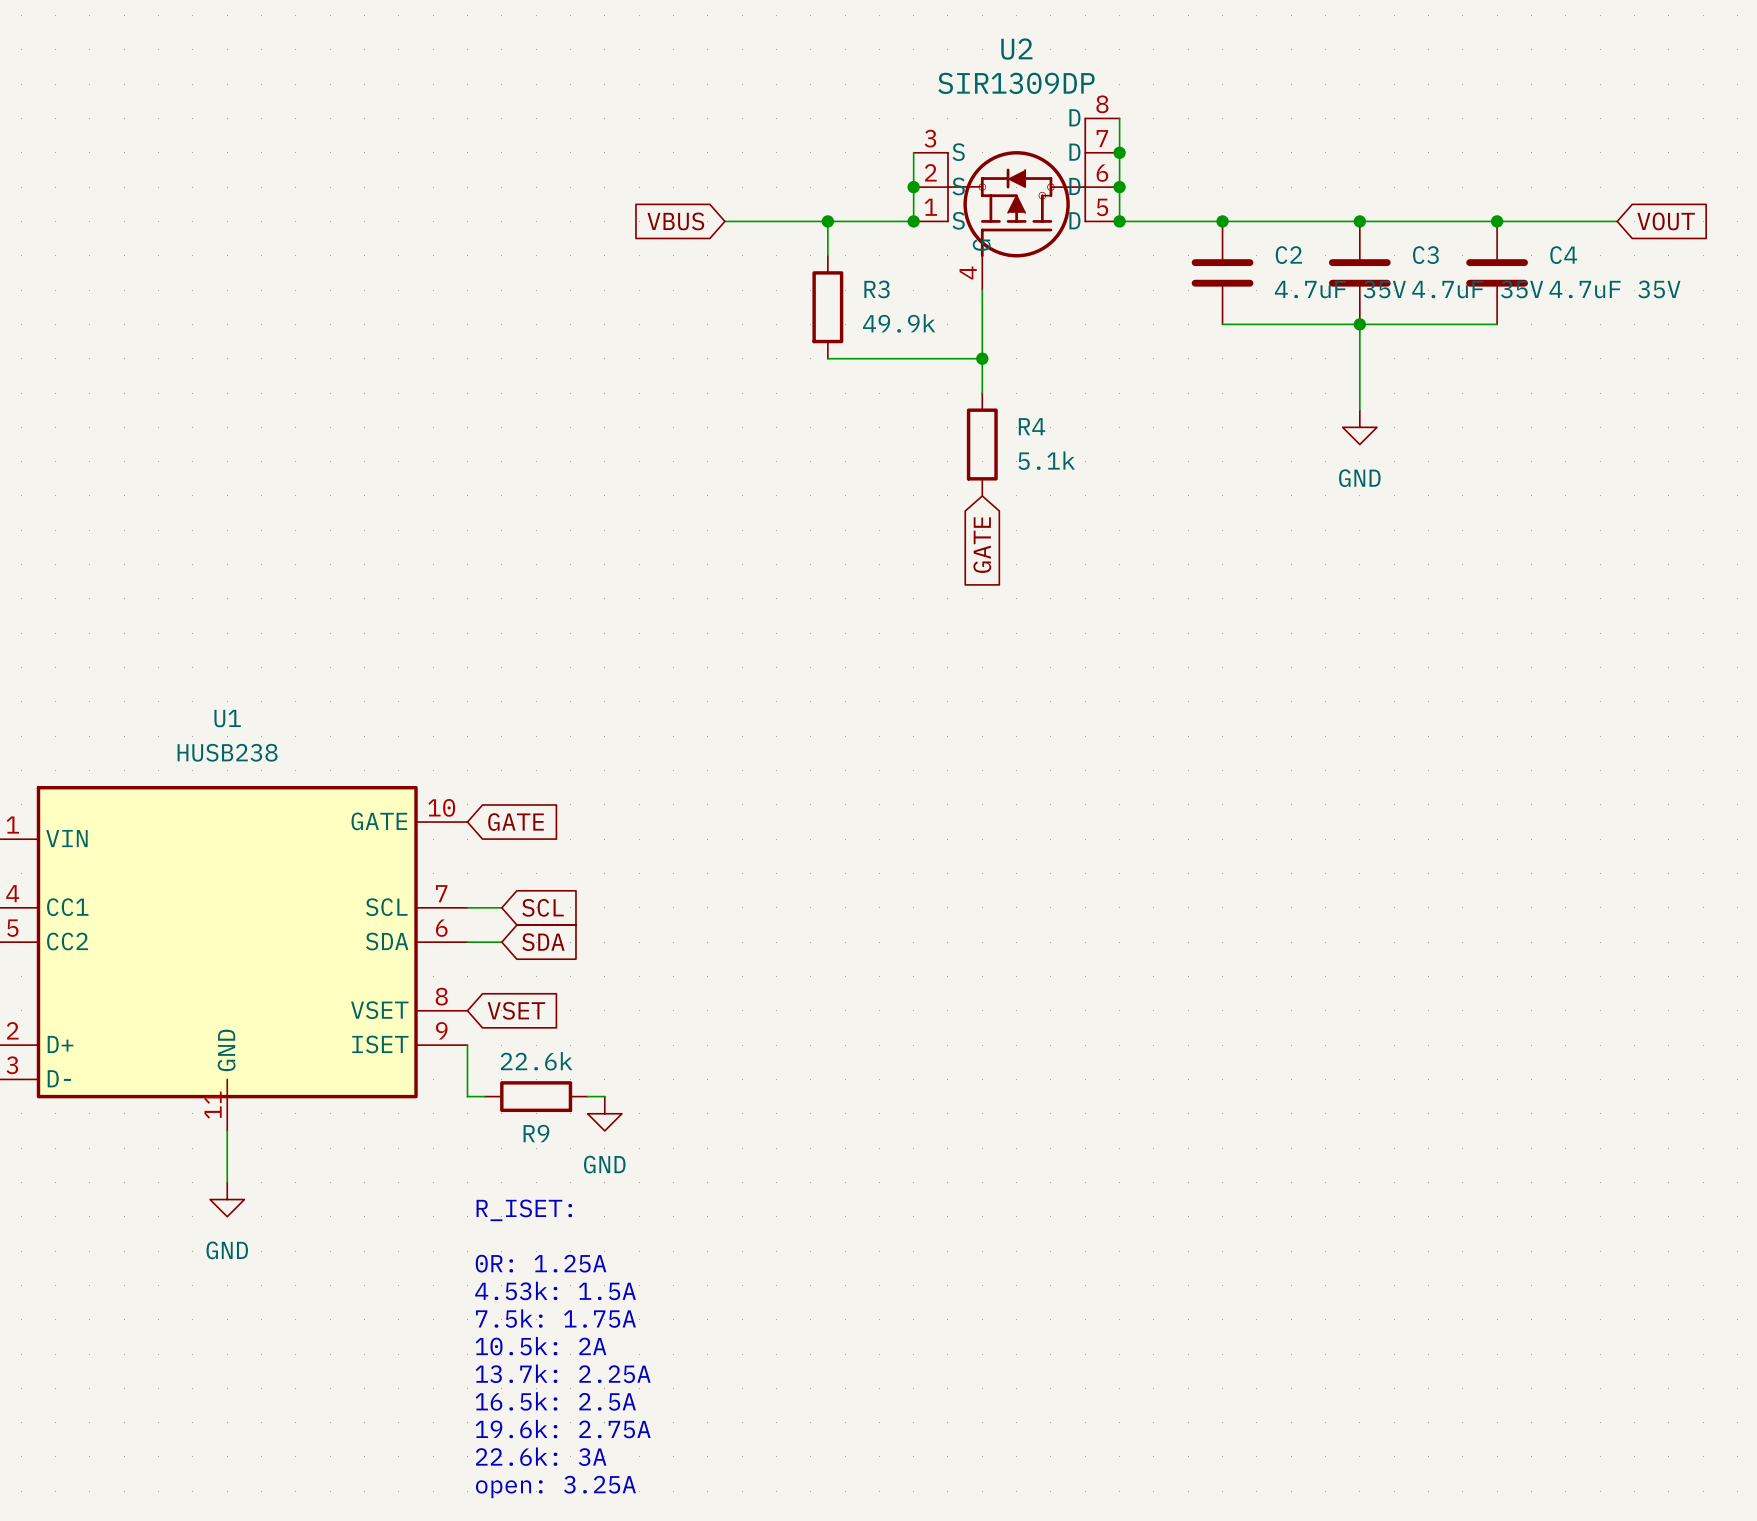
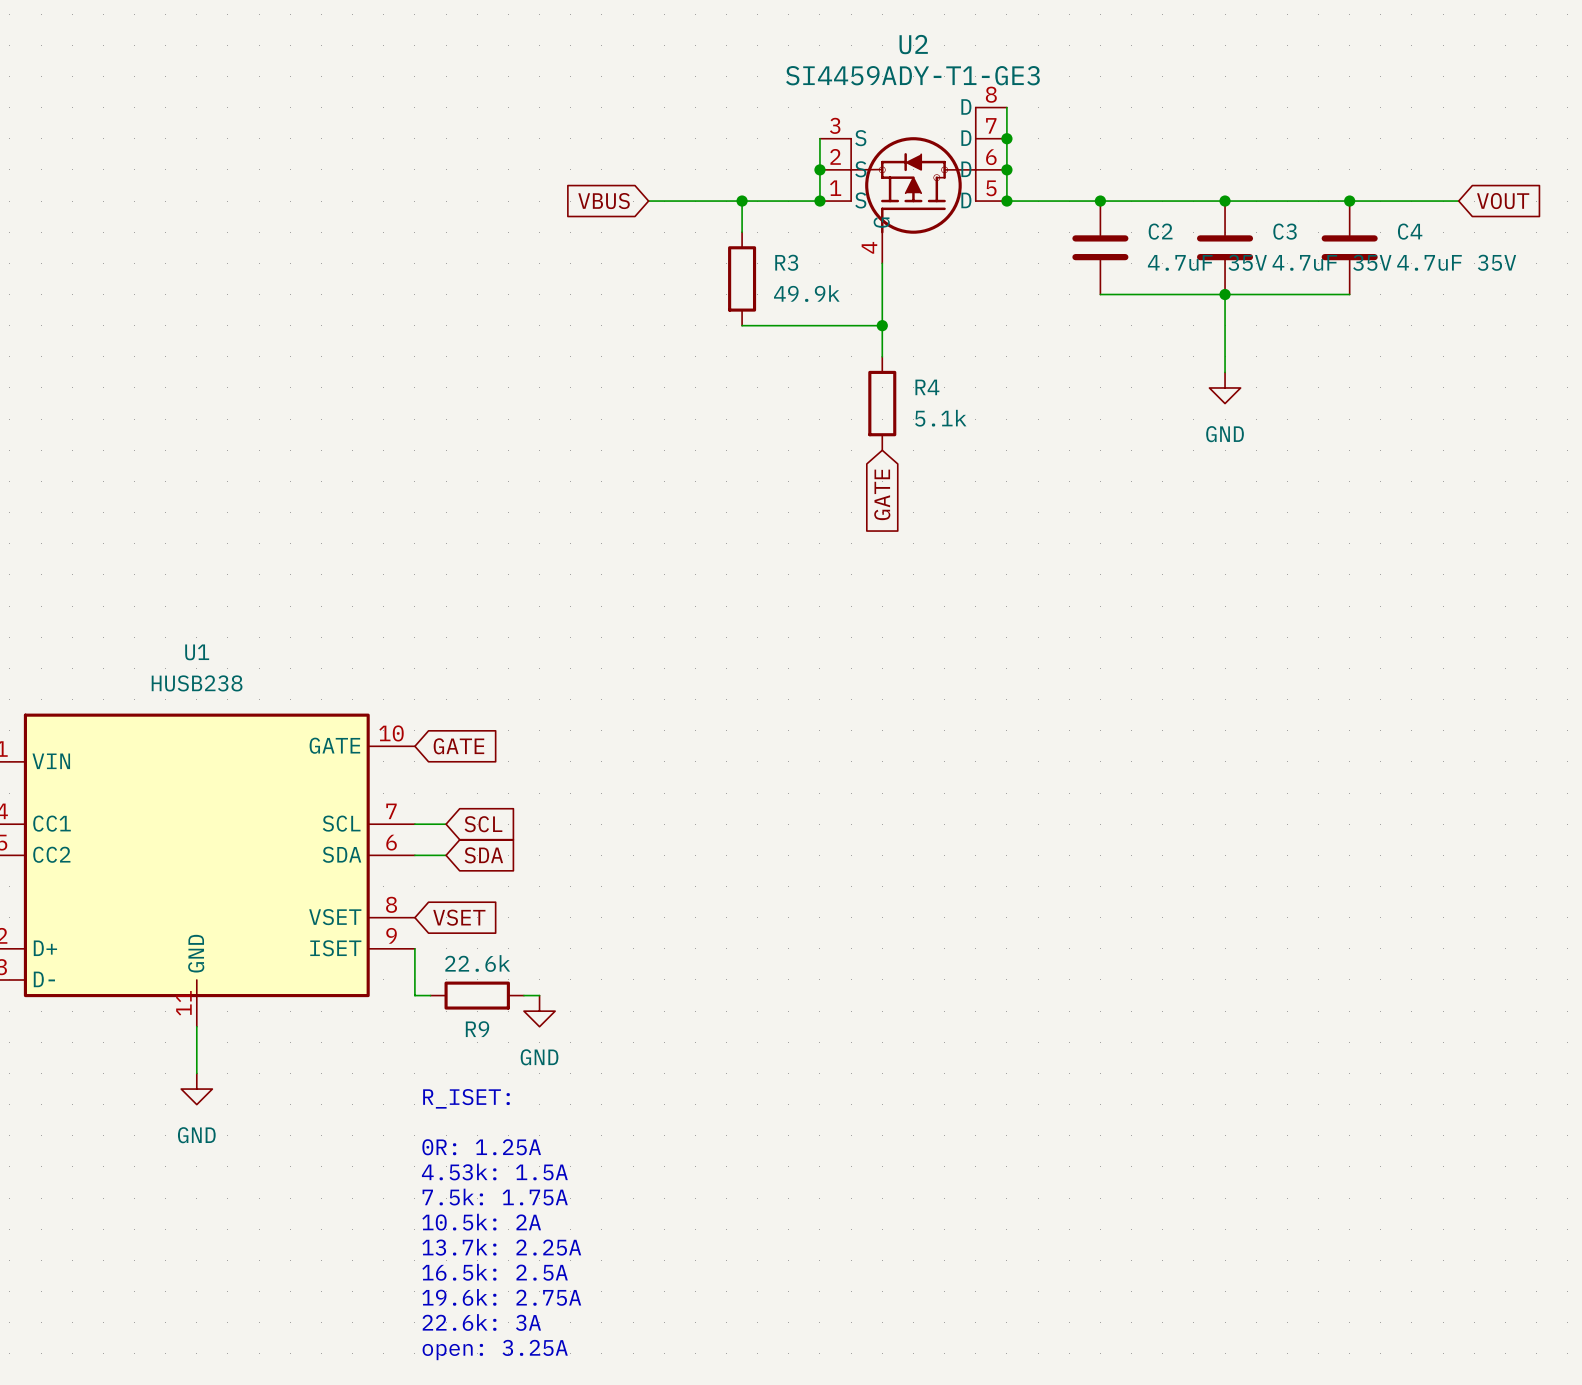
U2 value: SIR1309DP (1016, 83) -> SI4459ADY-T1-GE3 (912, 75)

